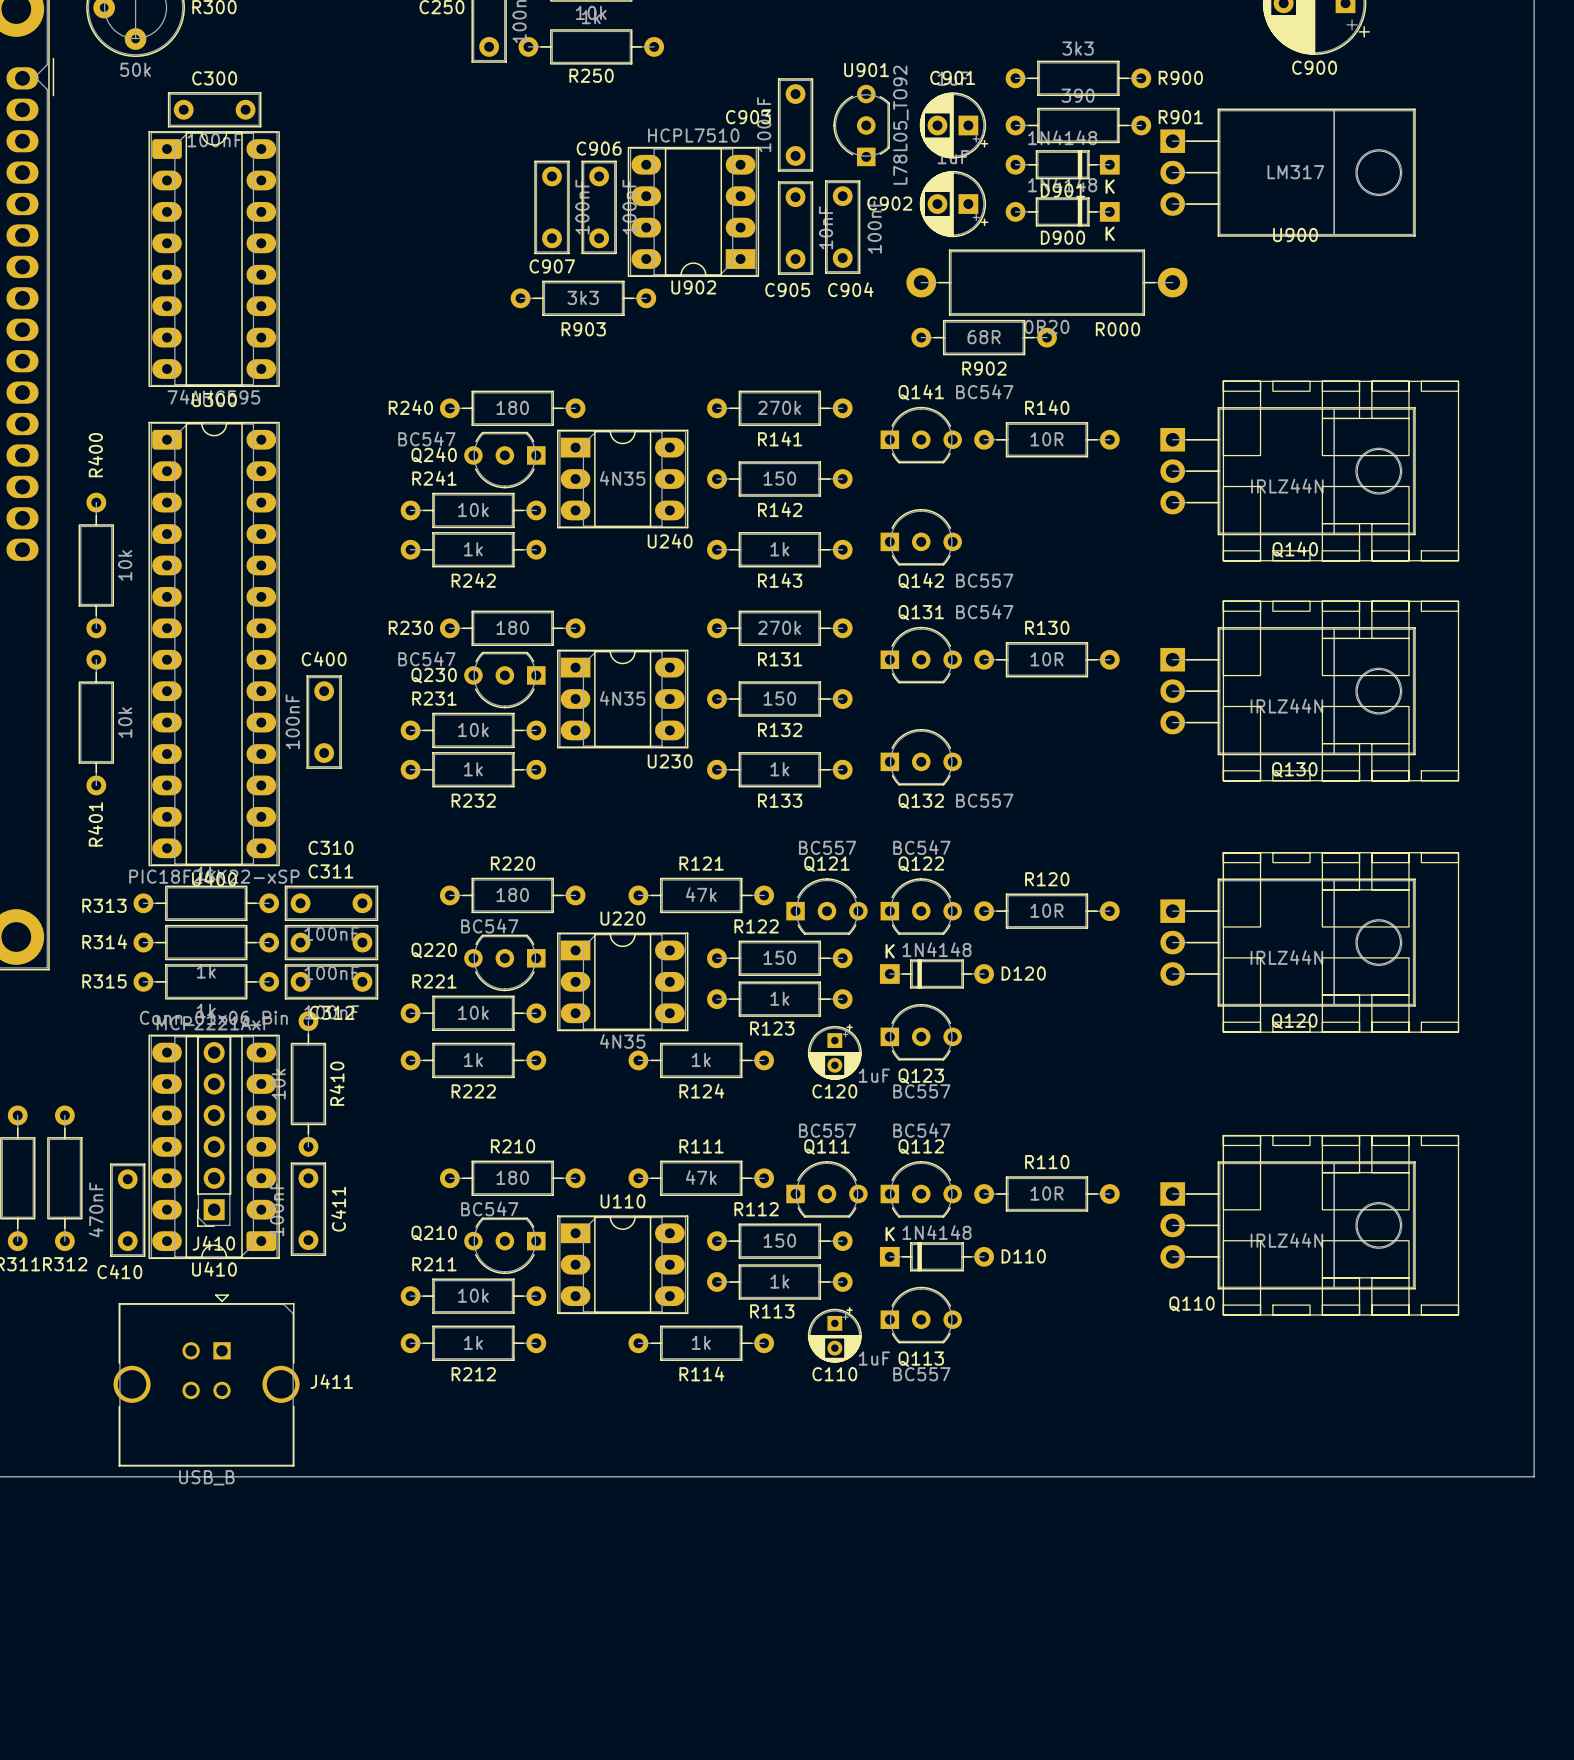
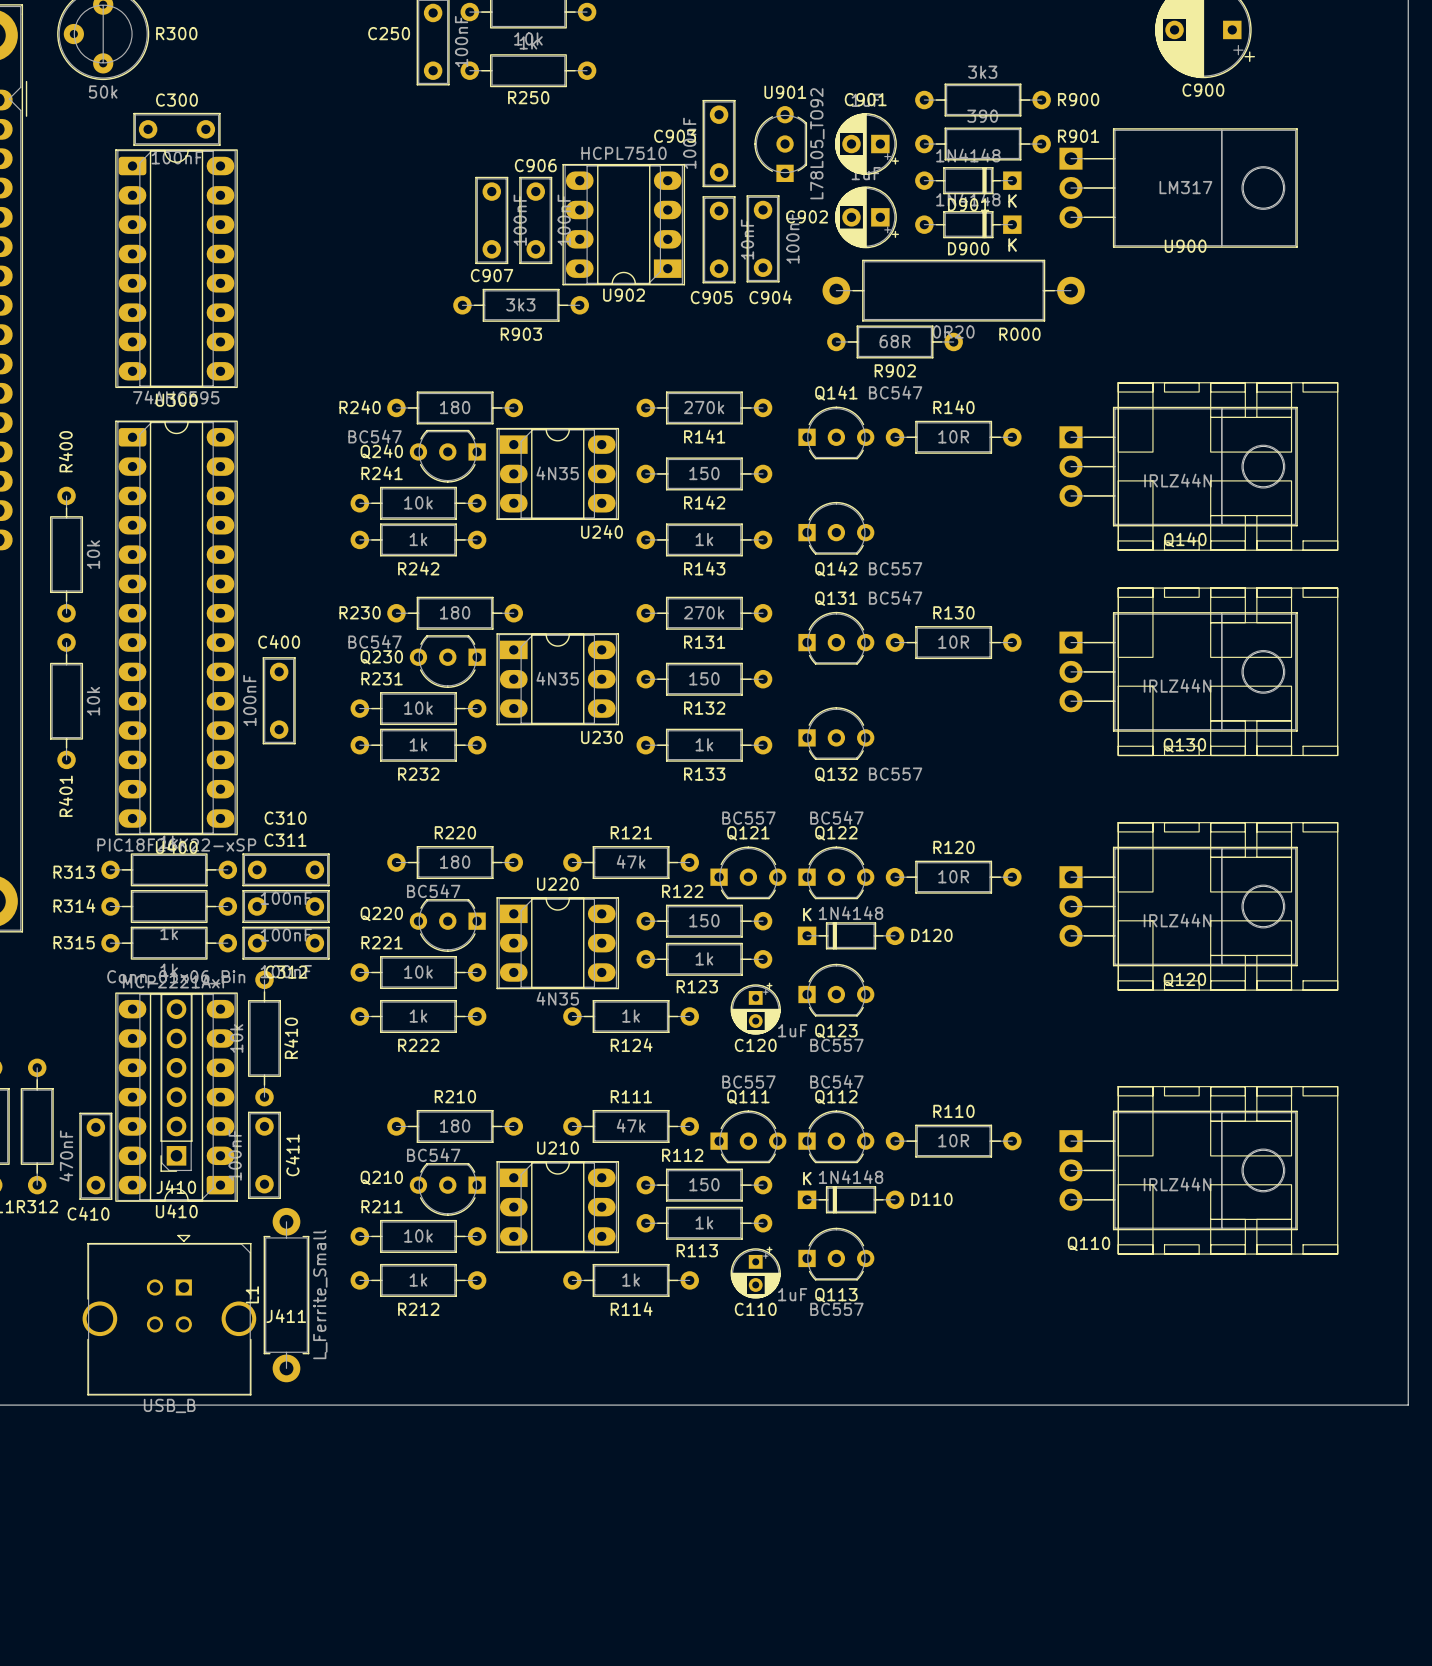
U110 name: U110 (623, 1201) -> U210 (558, 1148)
L1: none -> L_Ferrite_Small (286, 1295)

